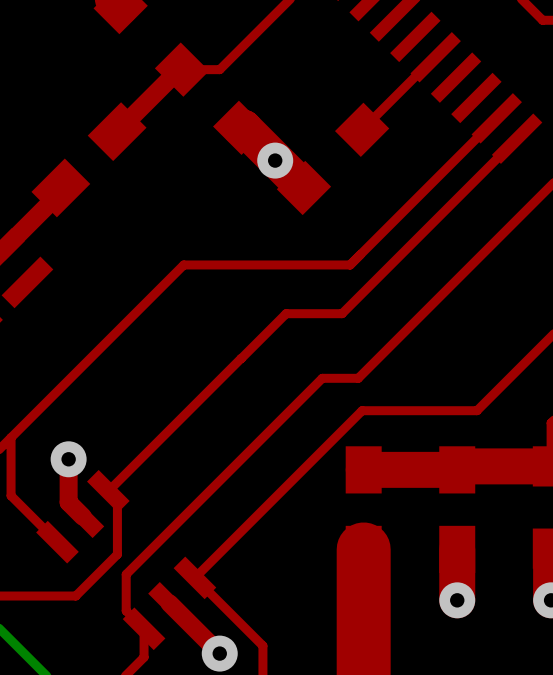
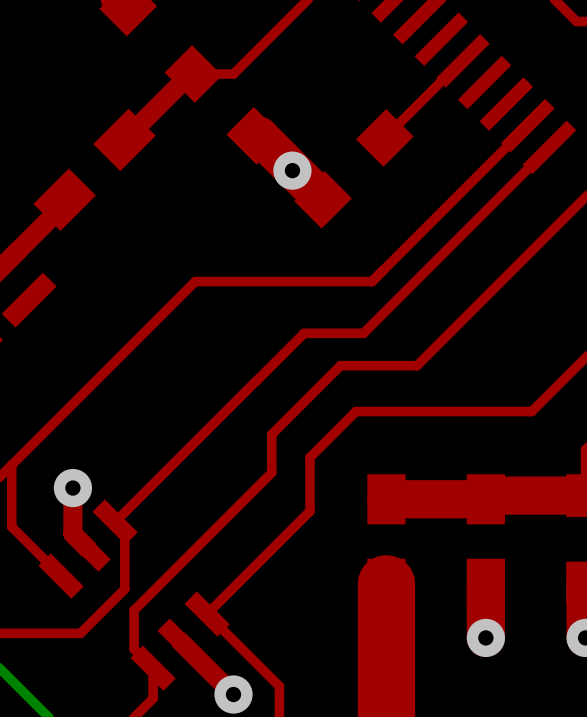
top track: (392, 344) (358, 378) (322, 378) (255, 444) -> (417, 365) (340, 365) (271, 434) (271, 472)
top track: (500, 387) (477, 410) (362, 410) (291, 481) -> (531, 411) (355, 411) (309, 457) (309, 511)

